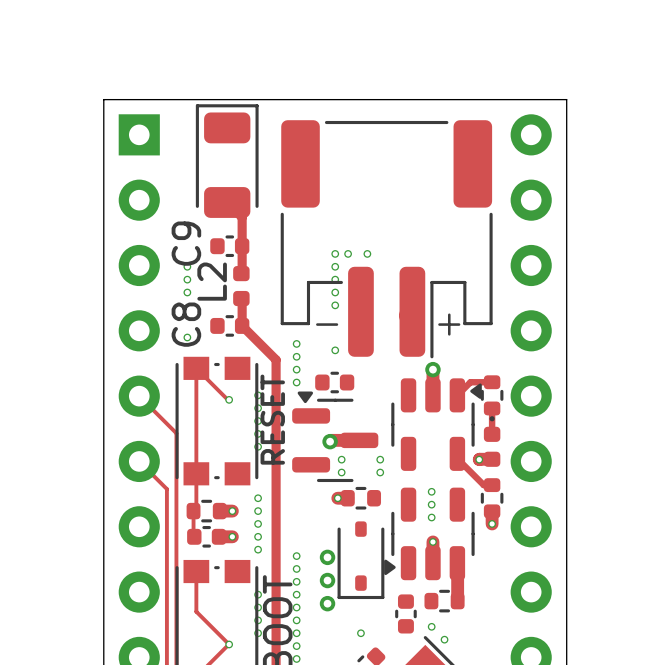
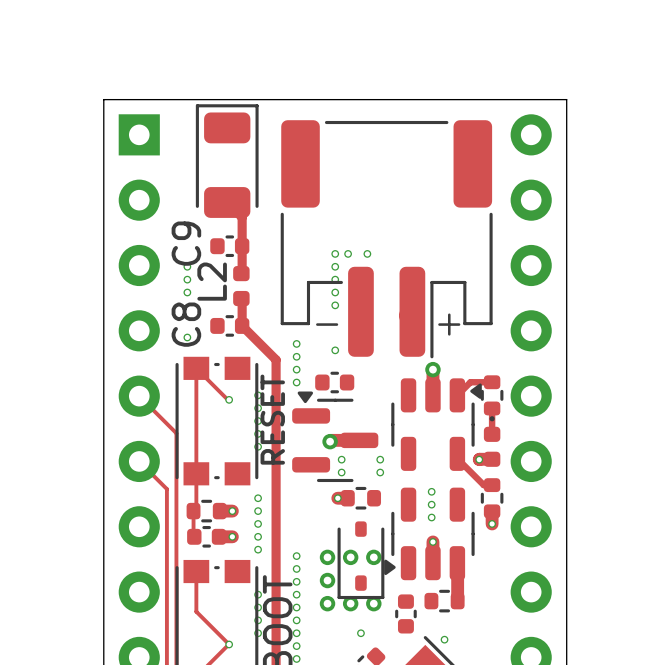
via: none -> (350, 557)
via: none -> (373, 557)
via: none -> (350, 603)
via: none -> (373, 603)
via: (431, 626) -> none

